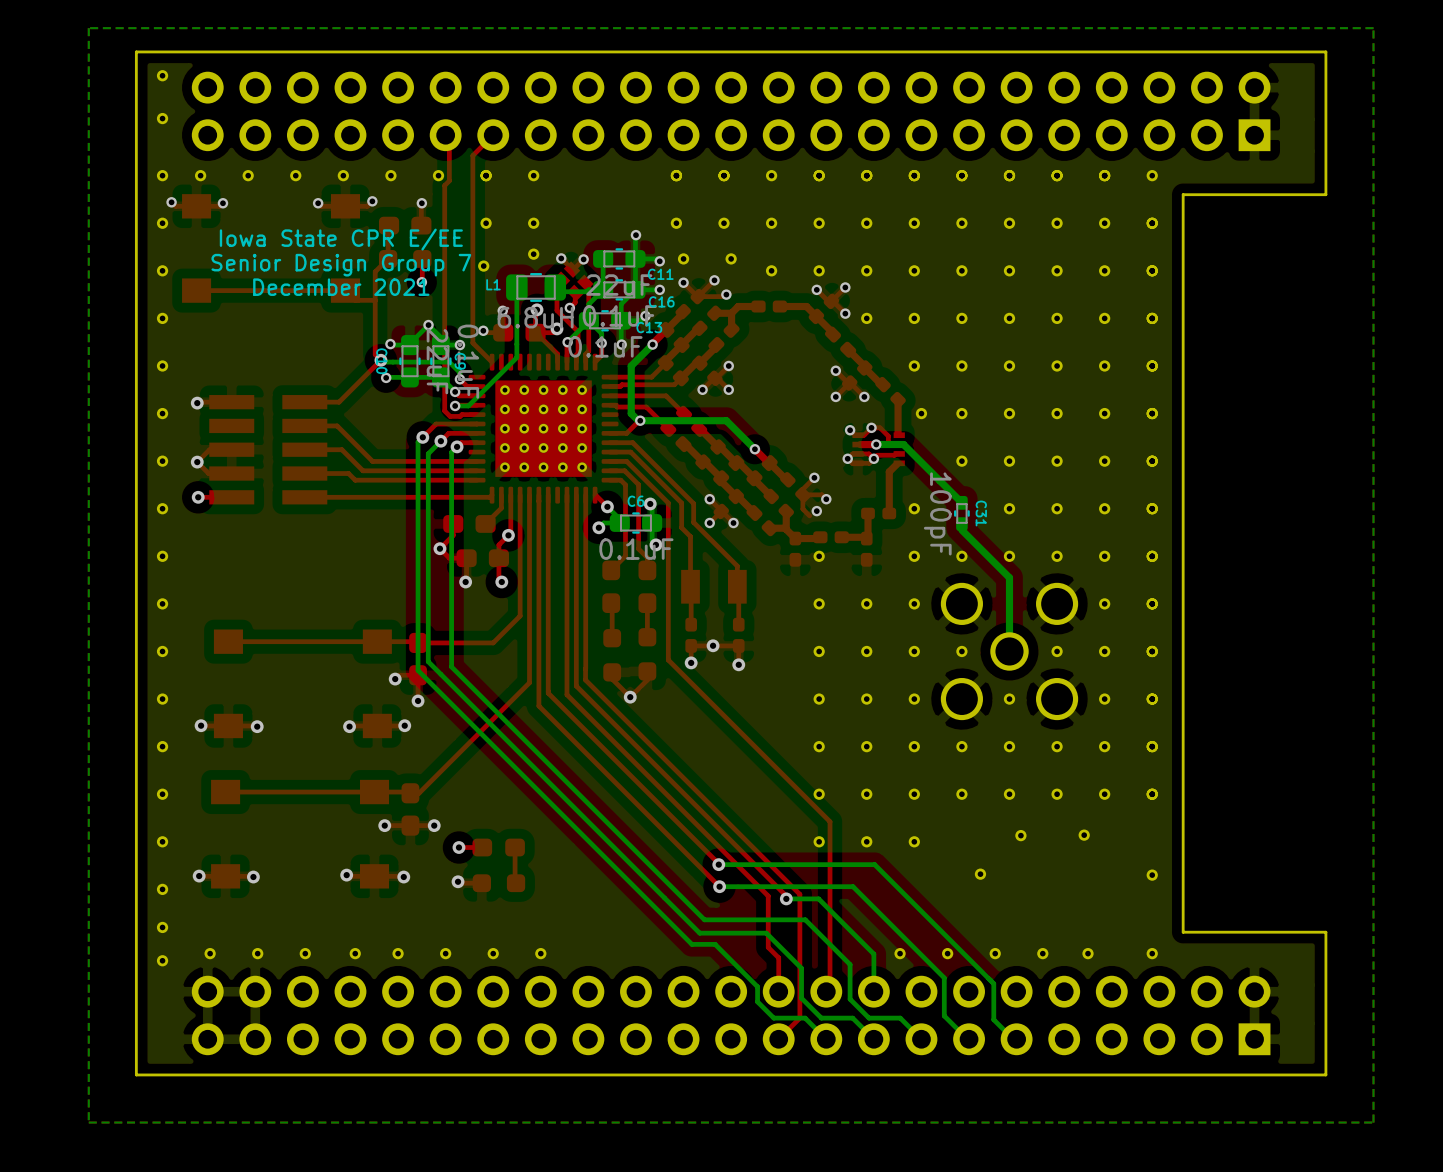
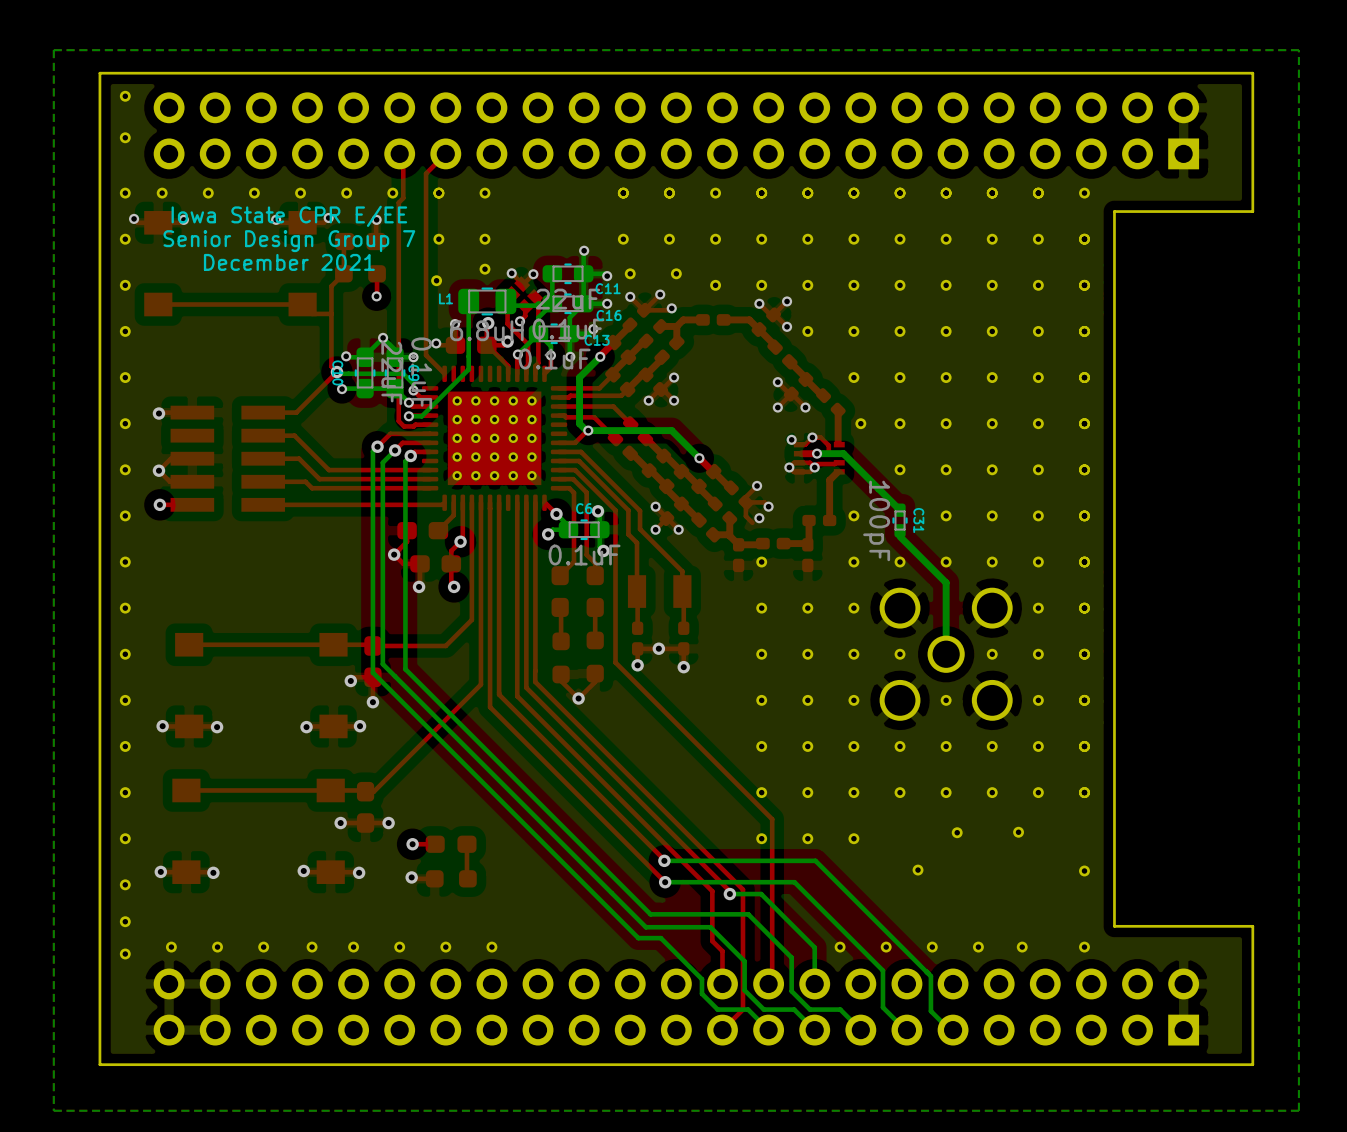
text position: Iowa State CPR E/EE (341, 239) -> Iowa State CPR E/EE (289, 216)
text position: Senior Design Group 7 (341, 265) -> Senior Design Group 7 (289, 241)
text position: December 2021 (341, 287) -> December 2021 (289, 262)

